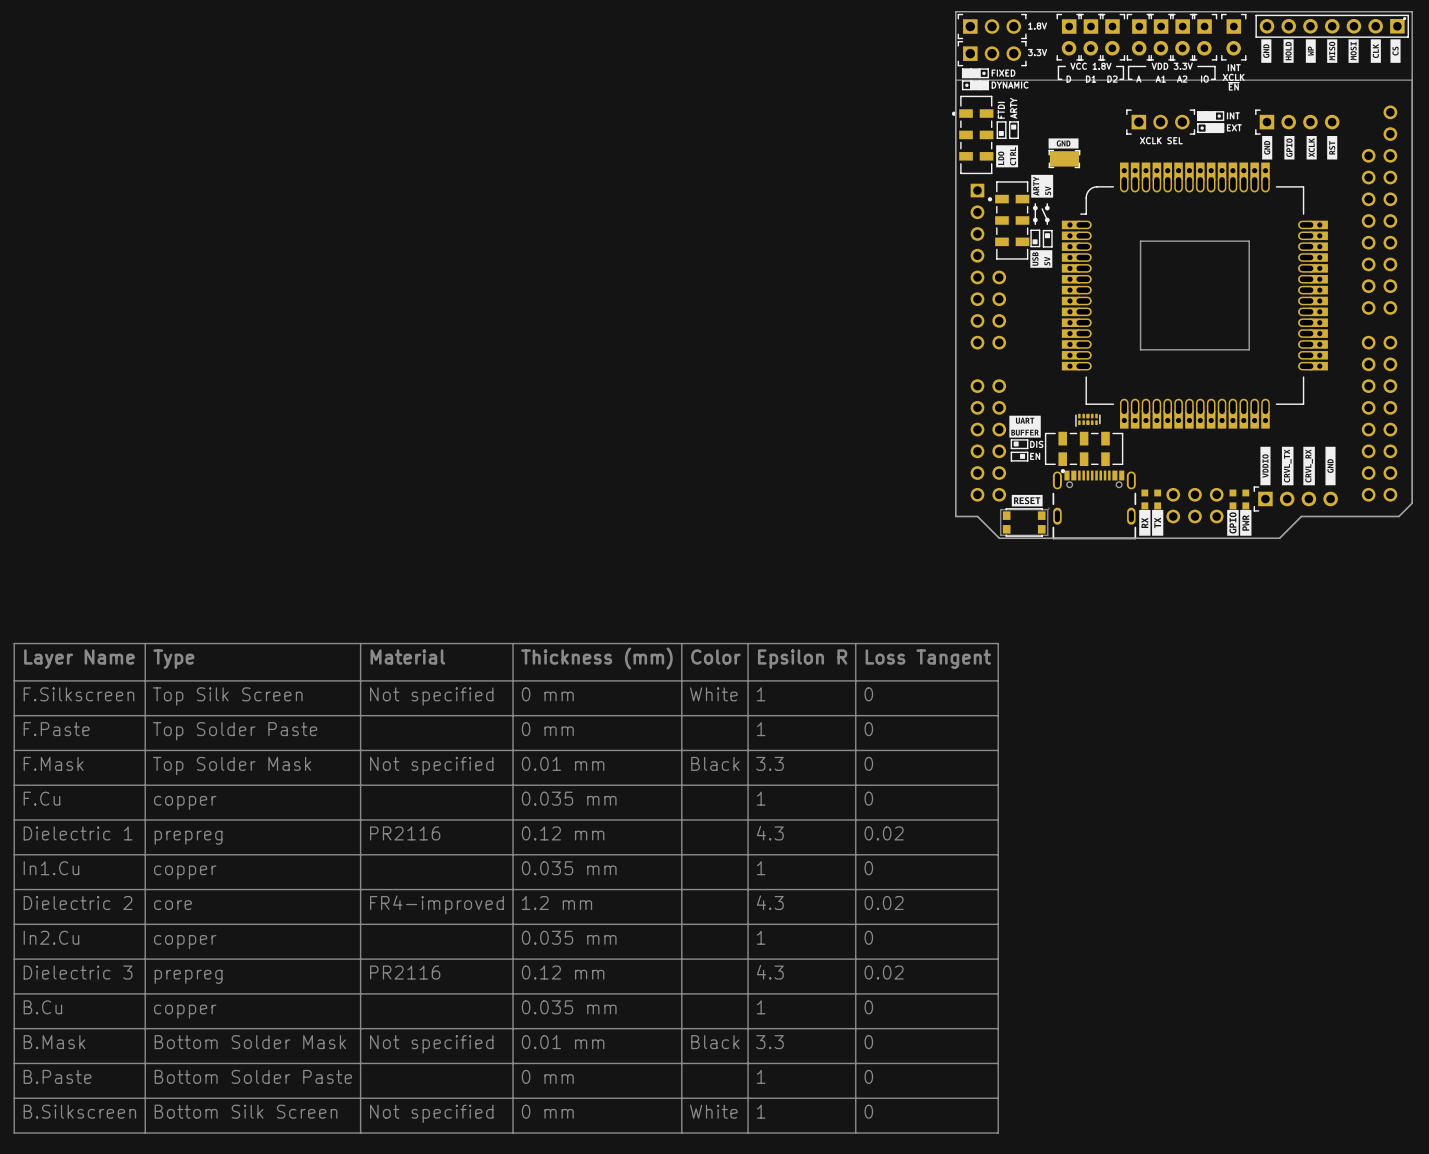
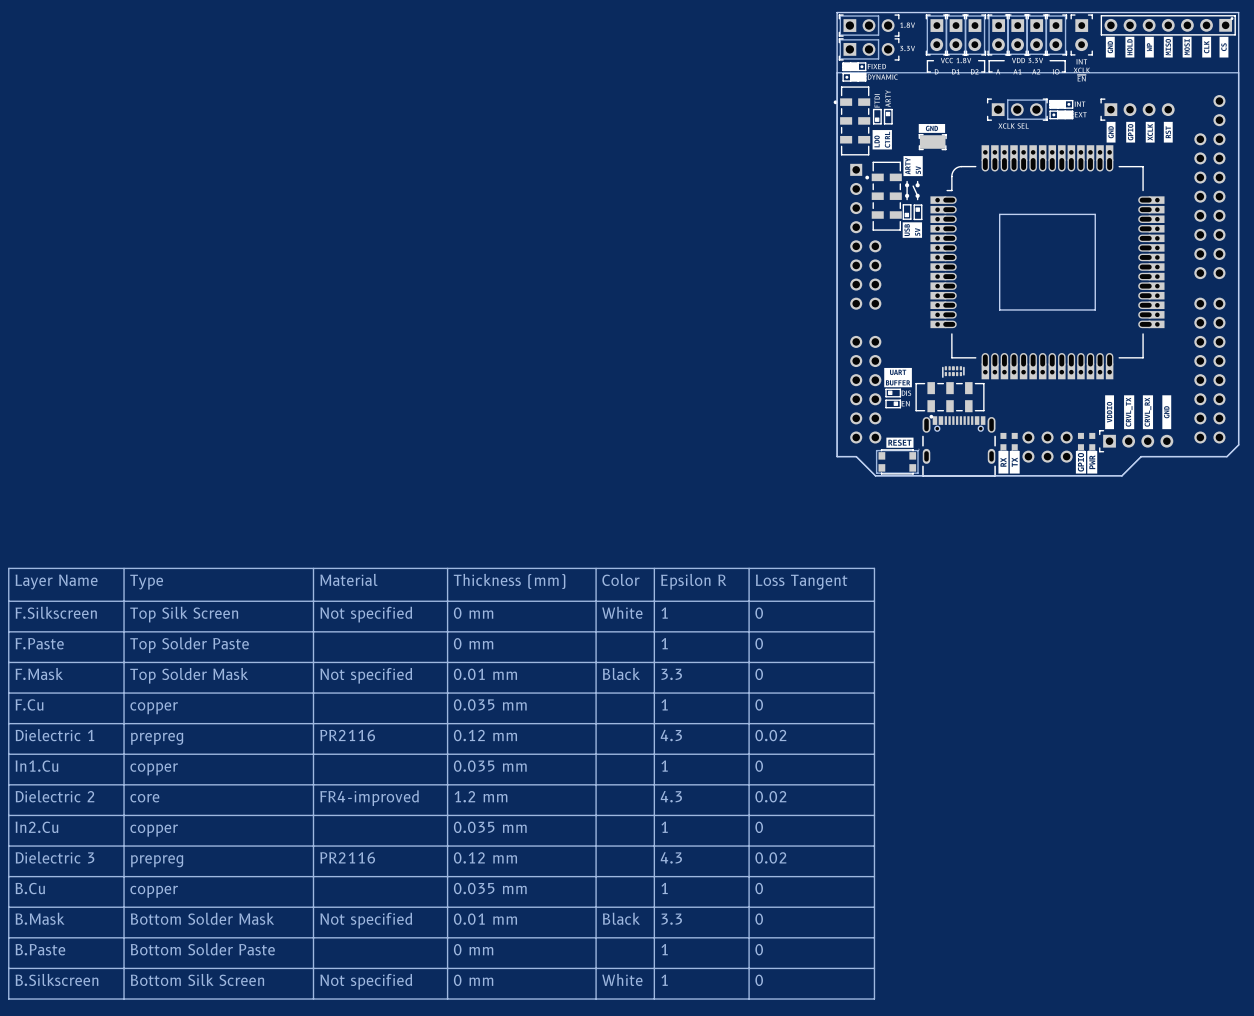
drawing: none -> [839, 15, 879, 60]
drawing: none -> [926, 15, 1066, 55]
drawing: none -> [1007, 99, 1047, 120]

